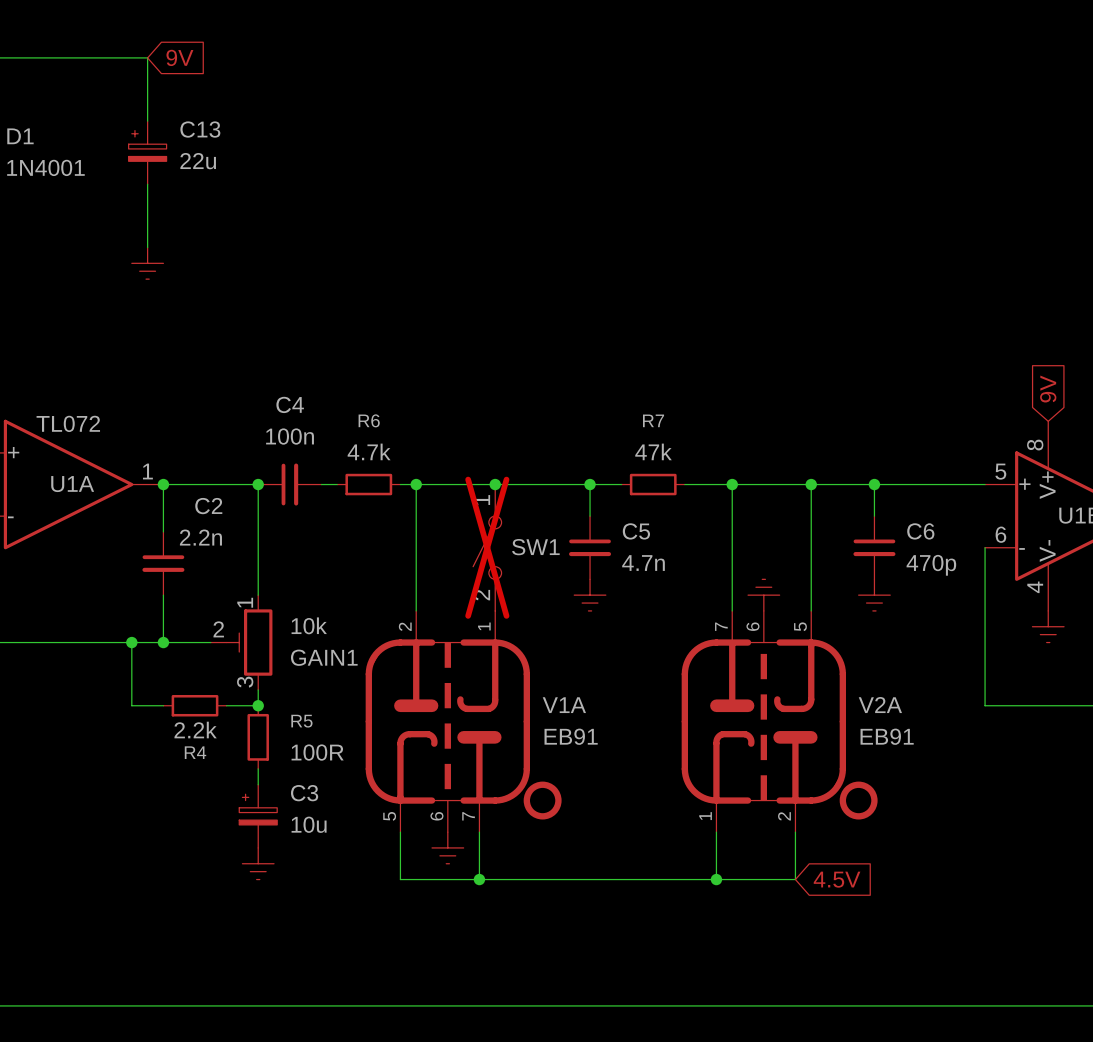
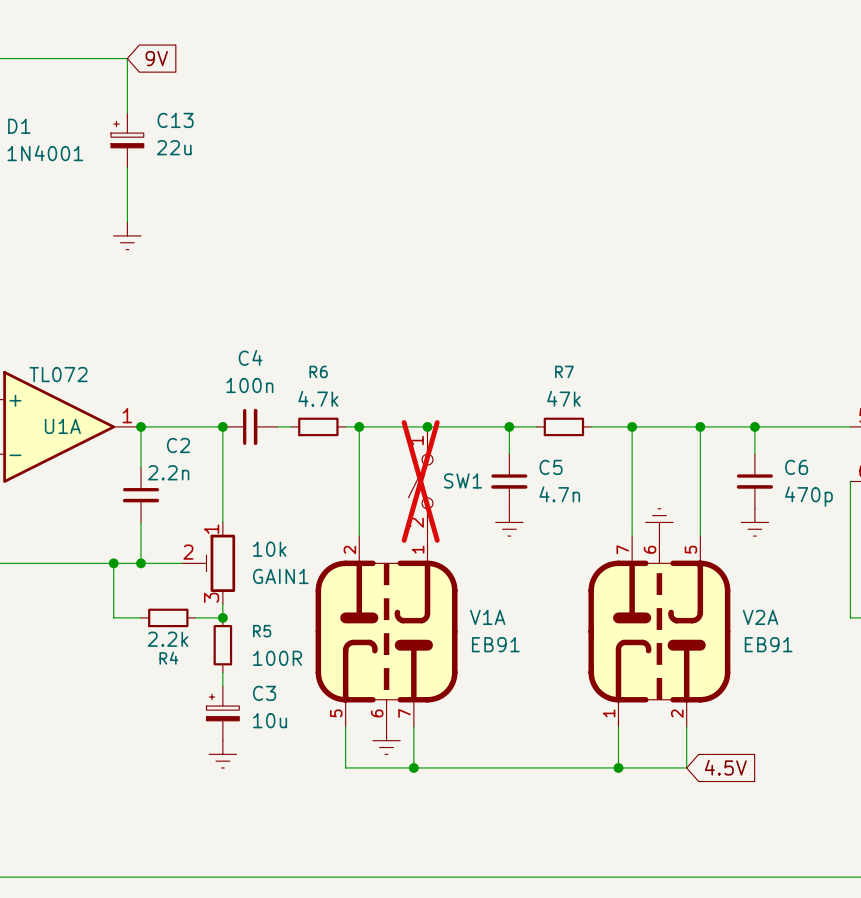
part: (542, 800) -> none
part: (858, 800) -> none

